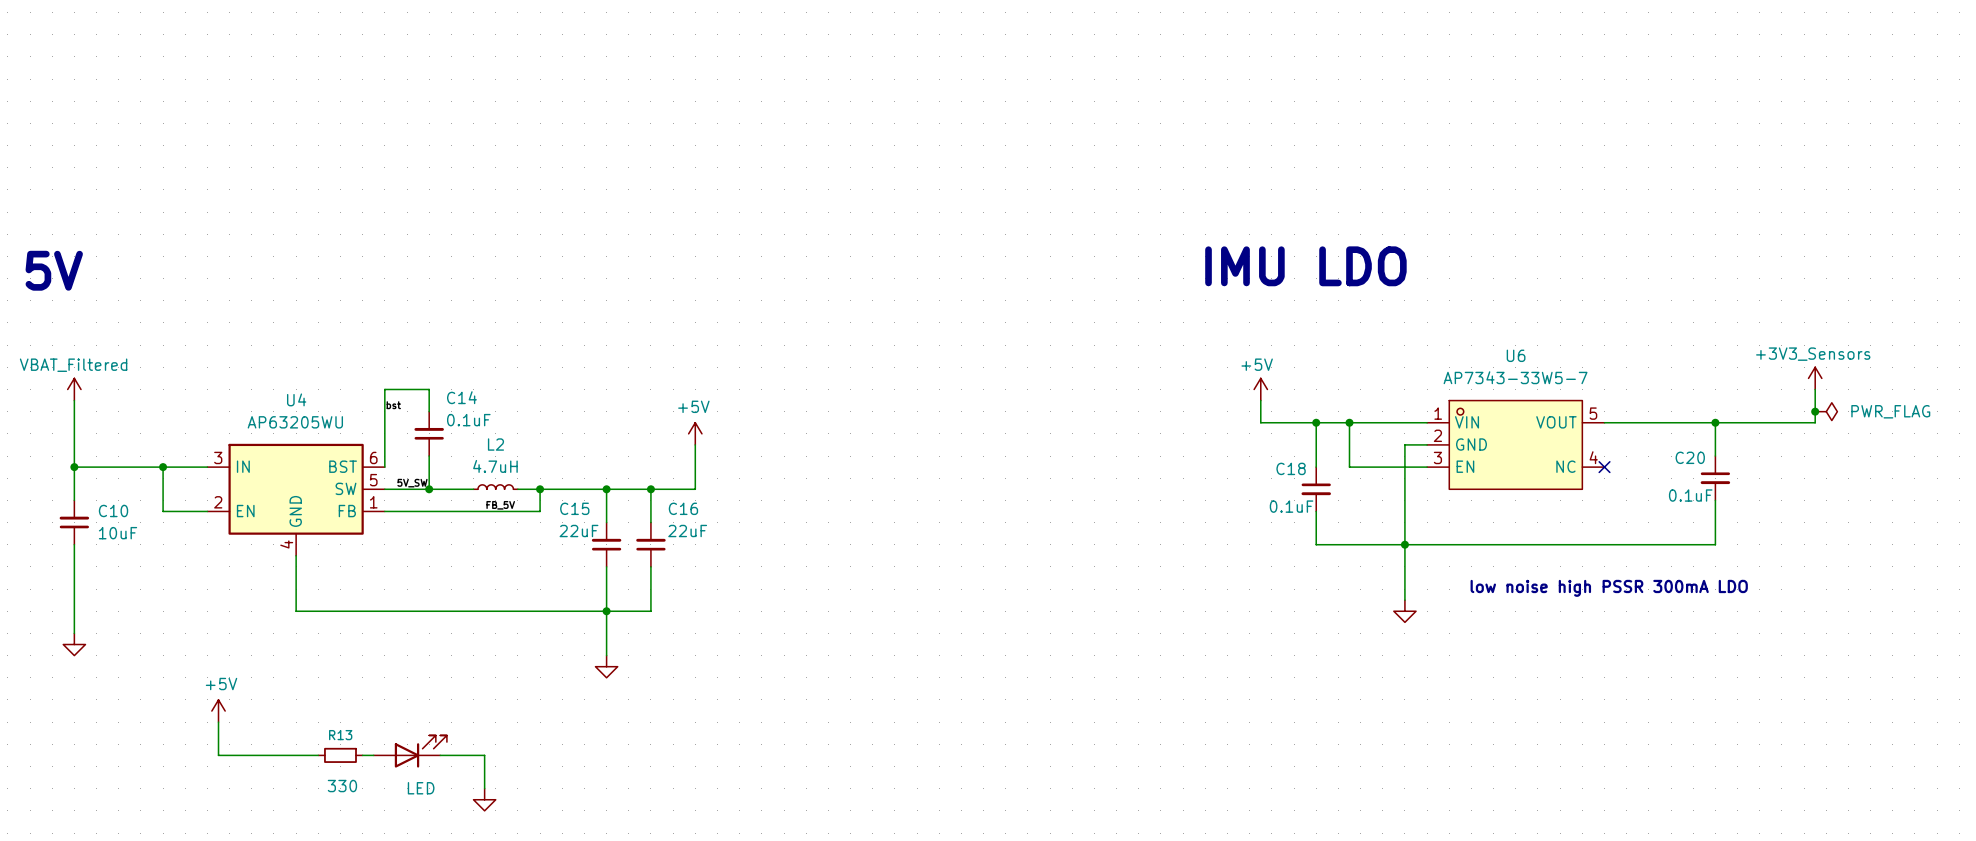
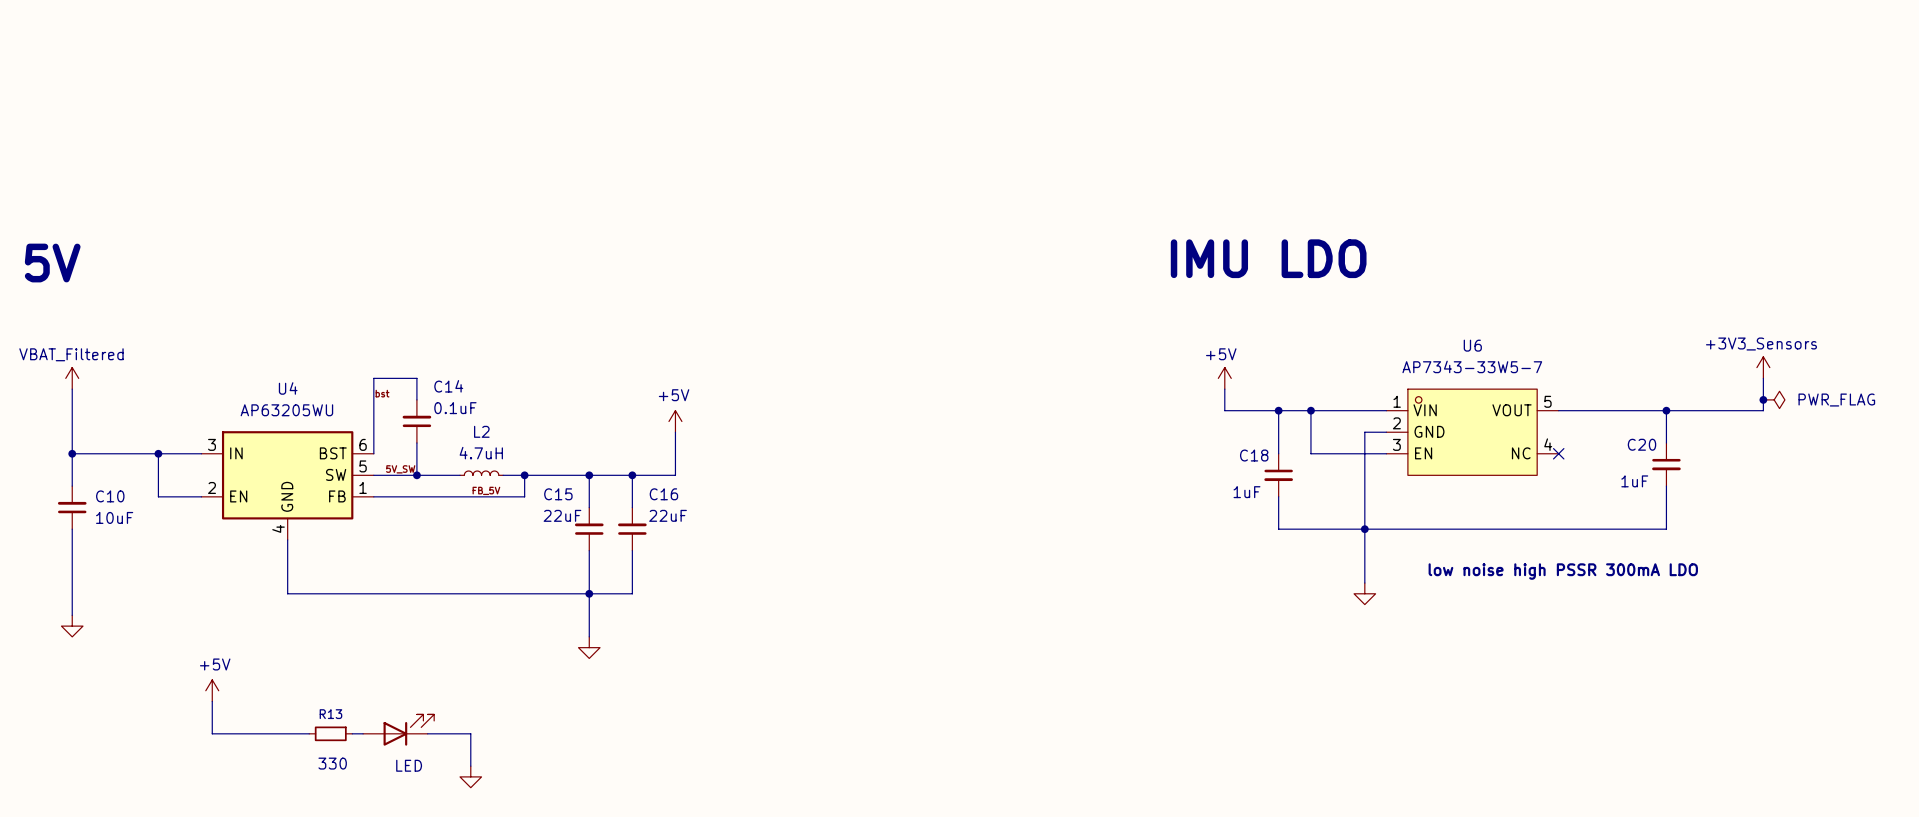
C20 value: 0.1uF (1690, 495) -> 1uF (1634, 481)
C18 value: 0.1uF (1291, 506) -> 1uF (1246, 492)

